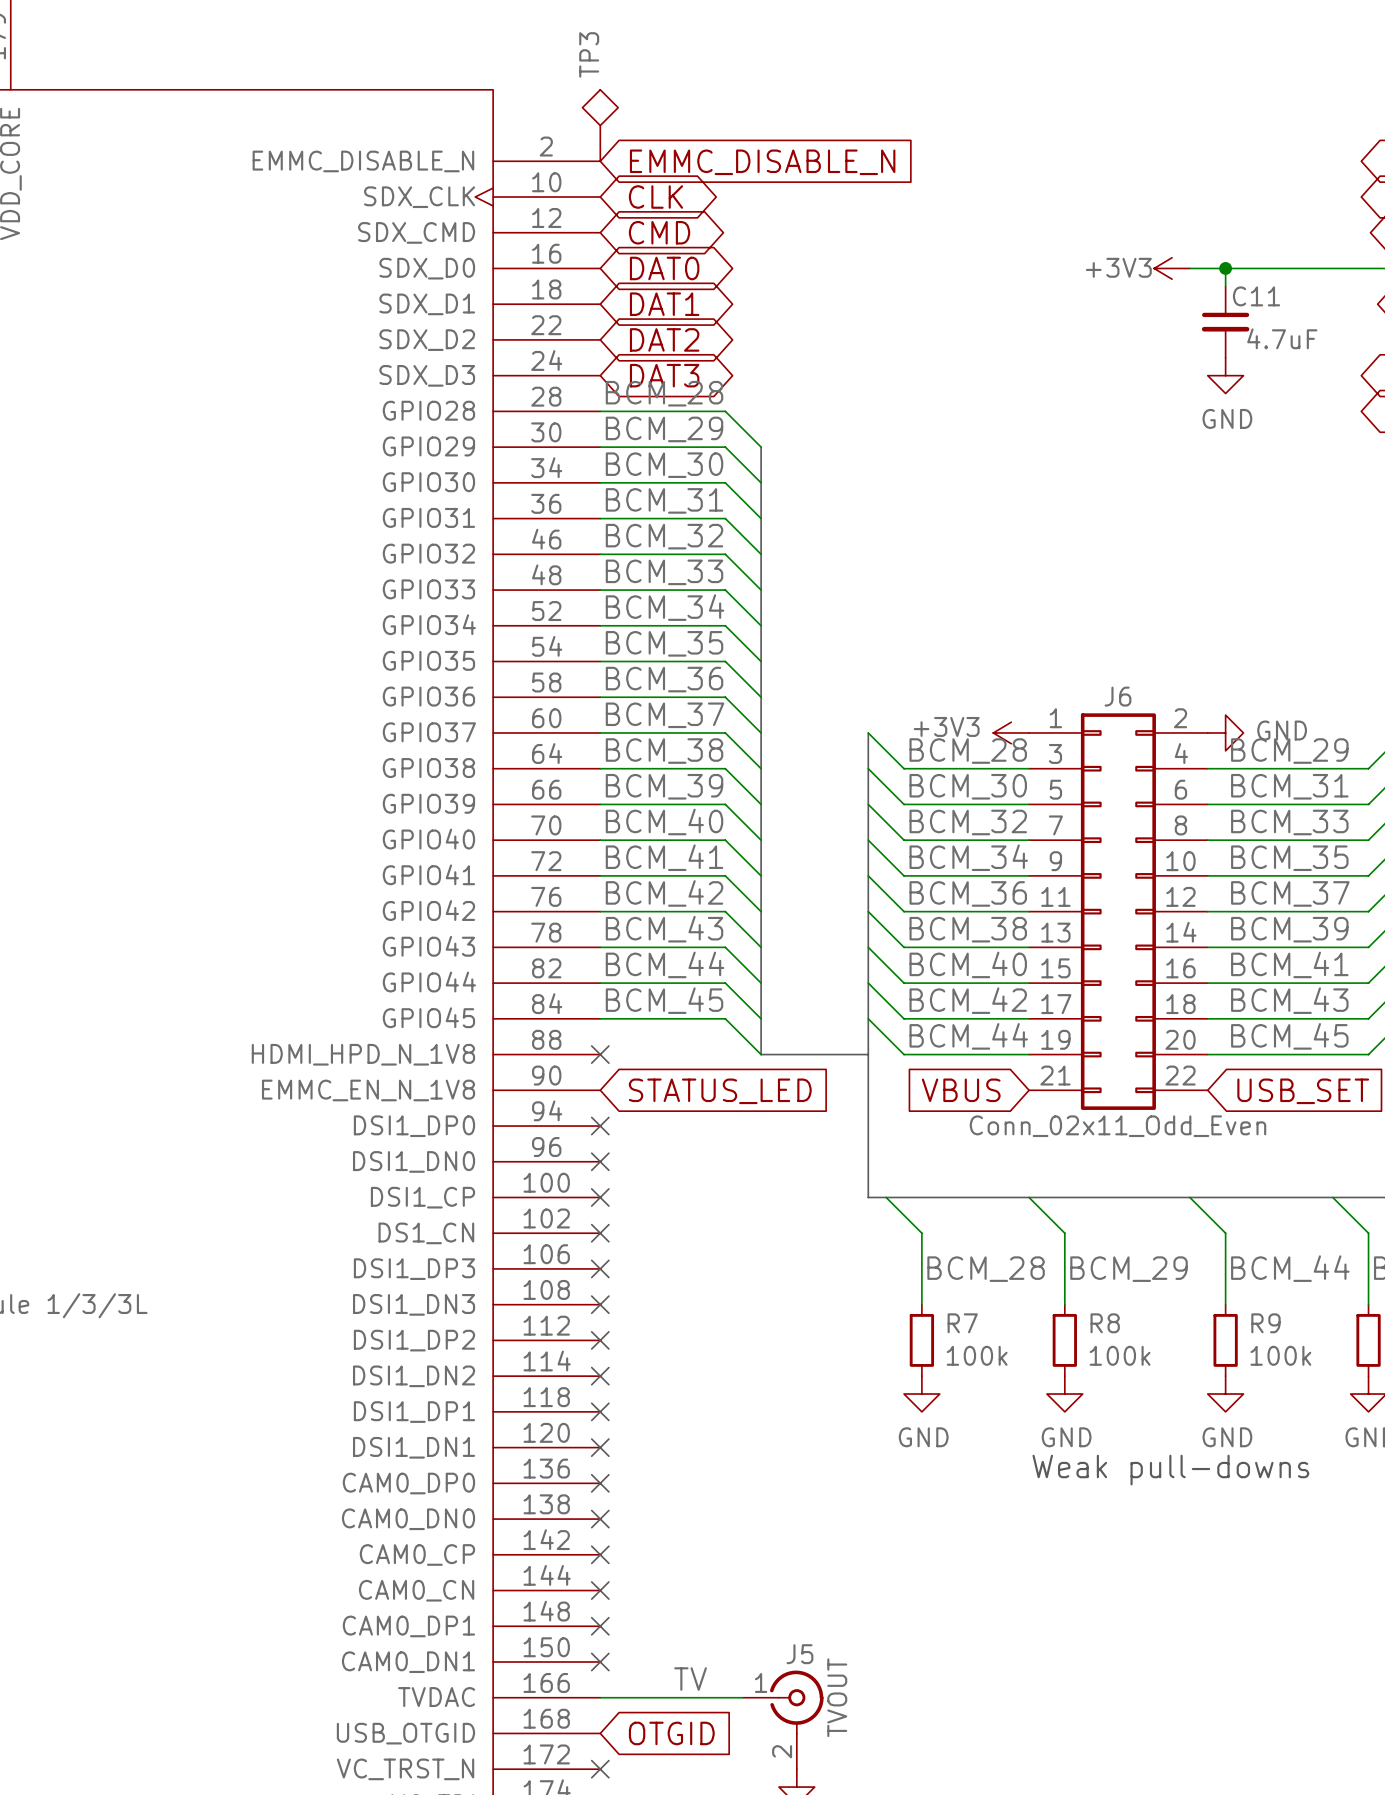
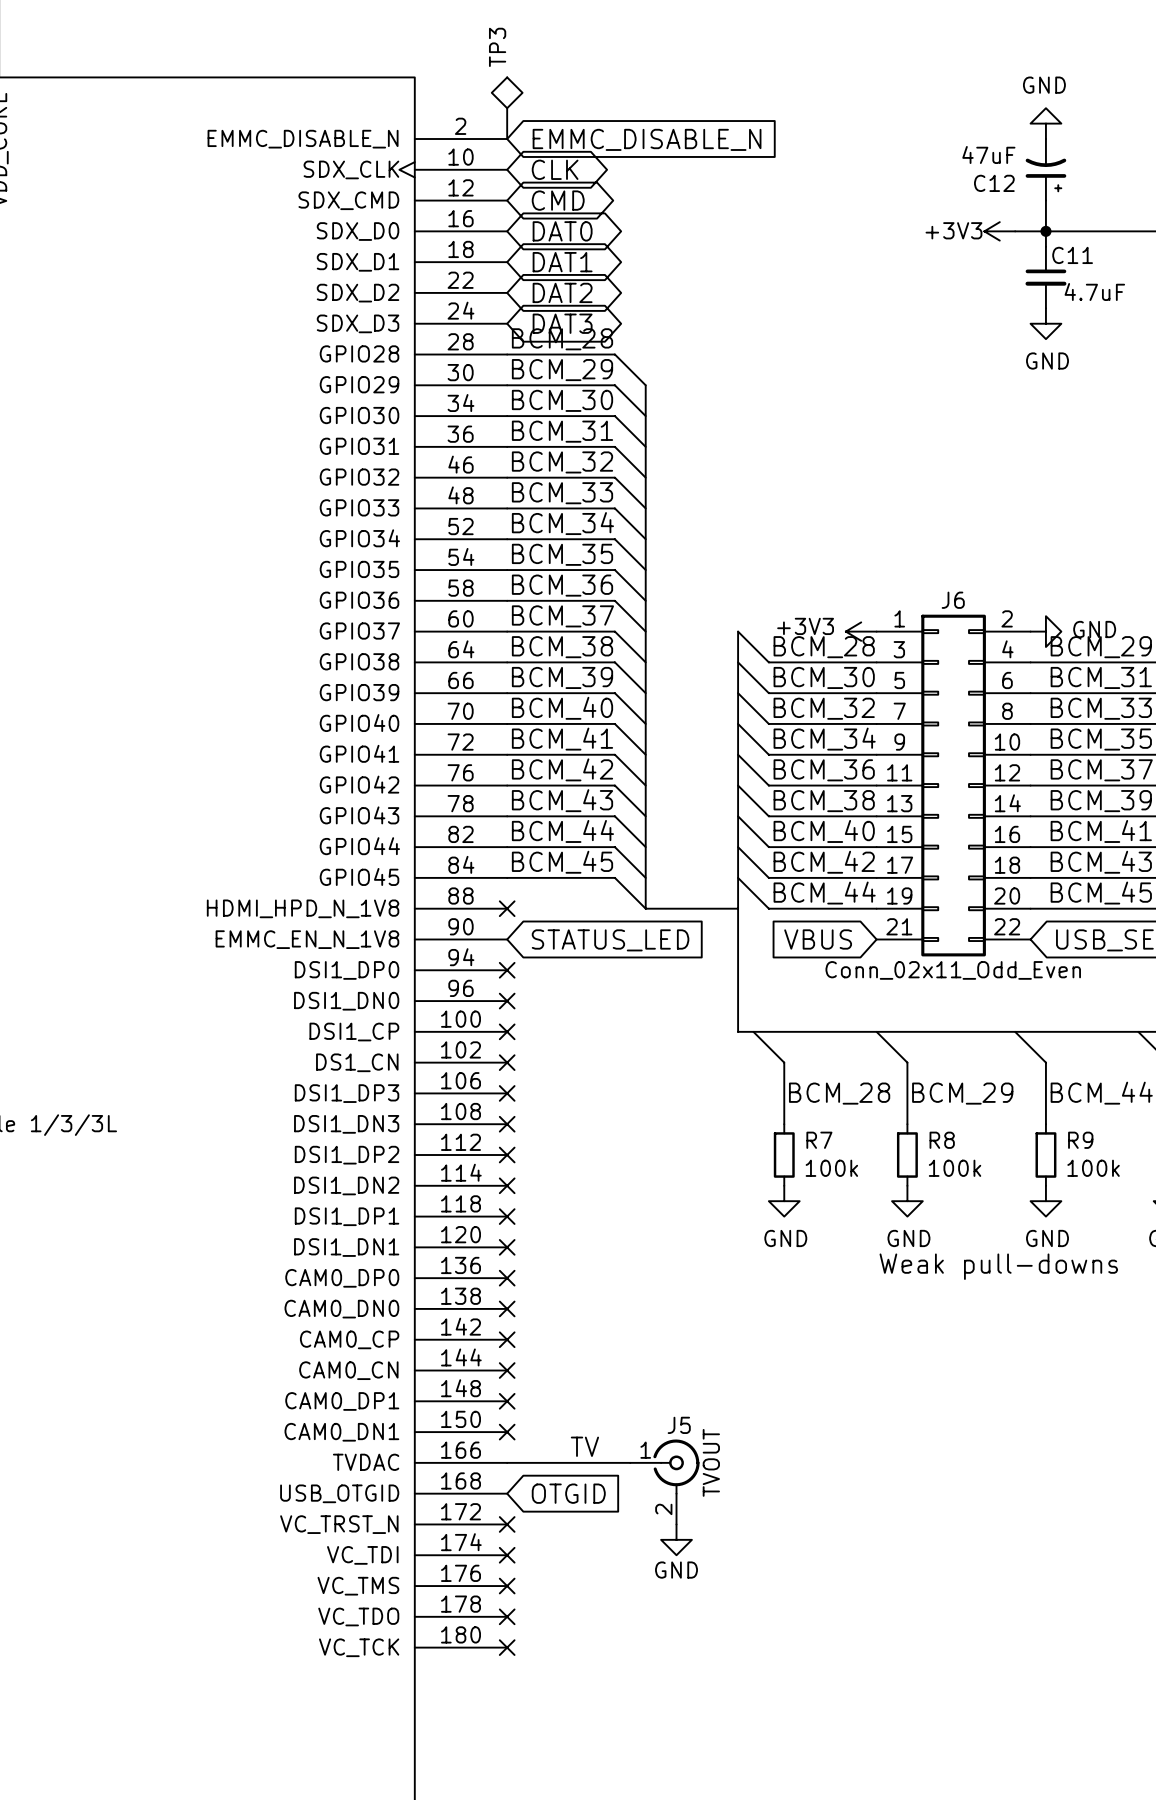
power symbol: none -> GND (1045, 123)
C12: none -> 47uF (1045, 169)
wire: none -> (1045, 200) (1045, 231)

